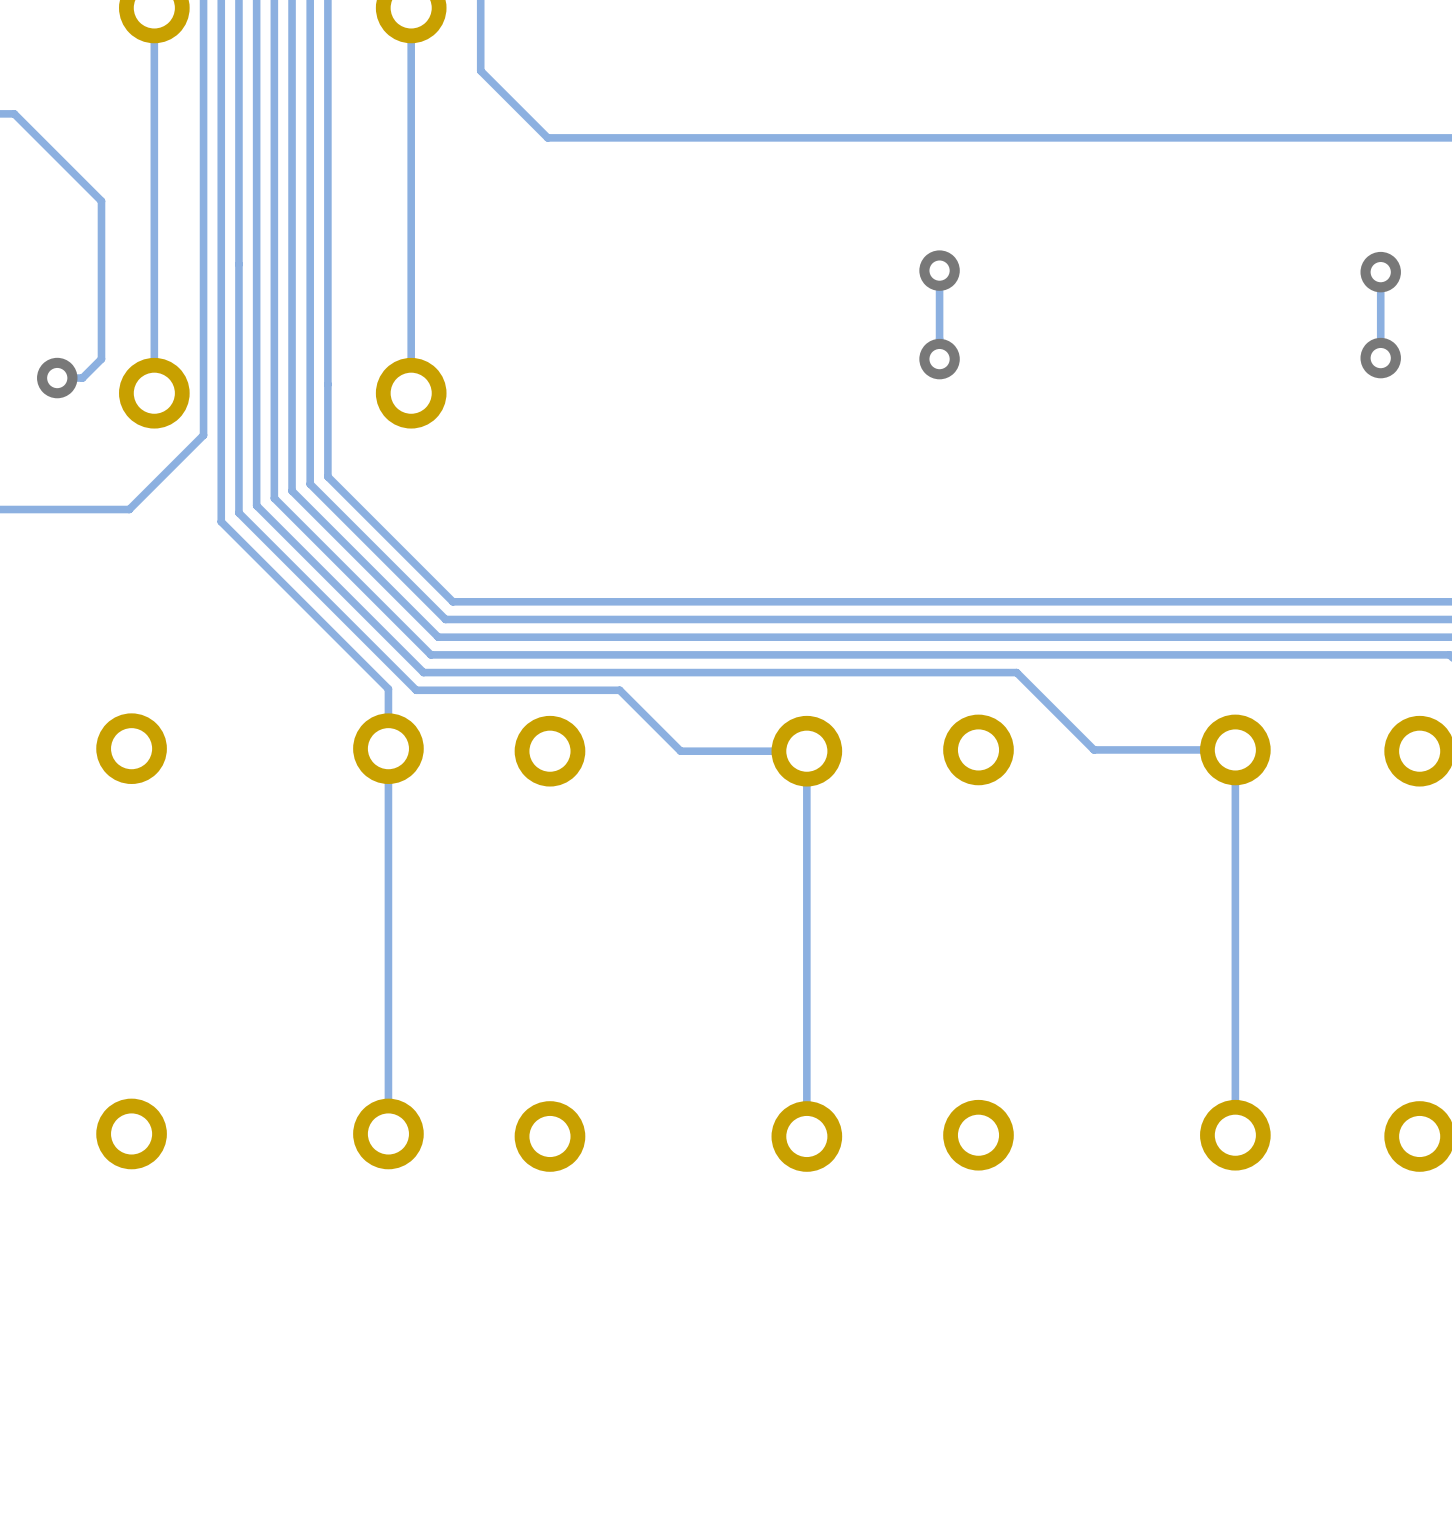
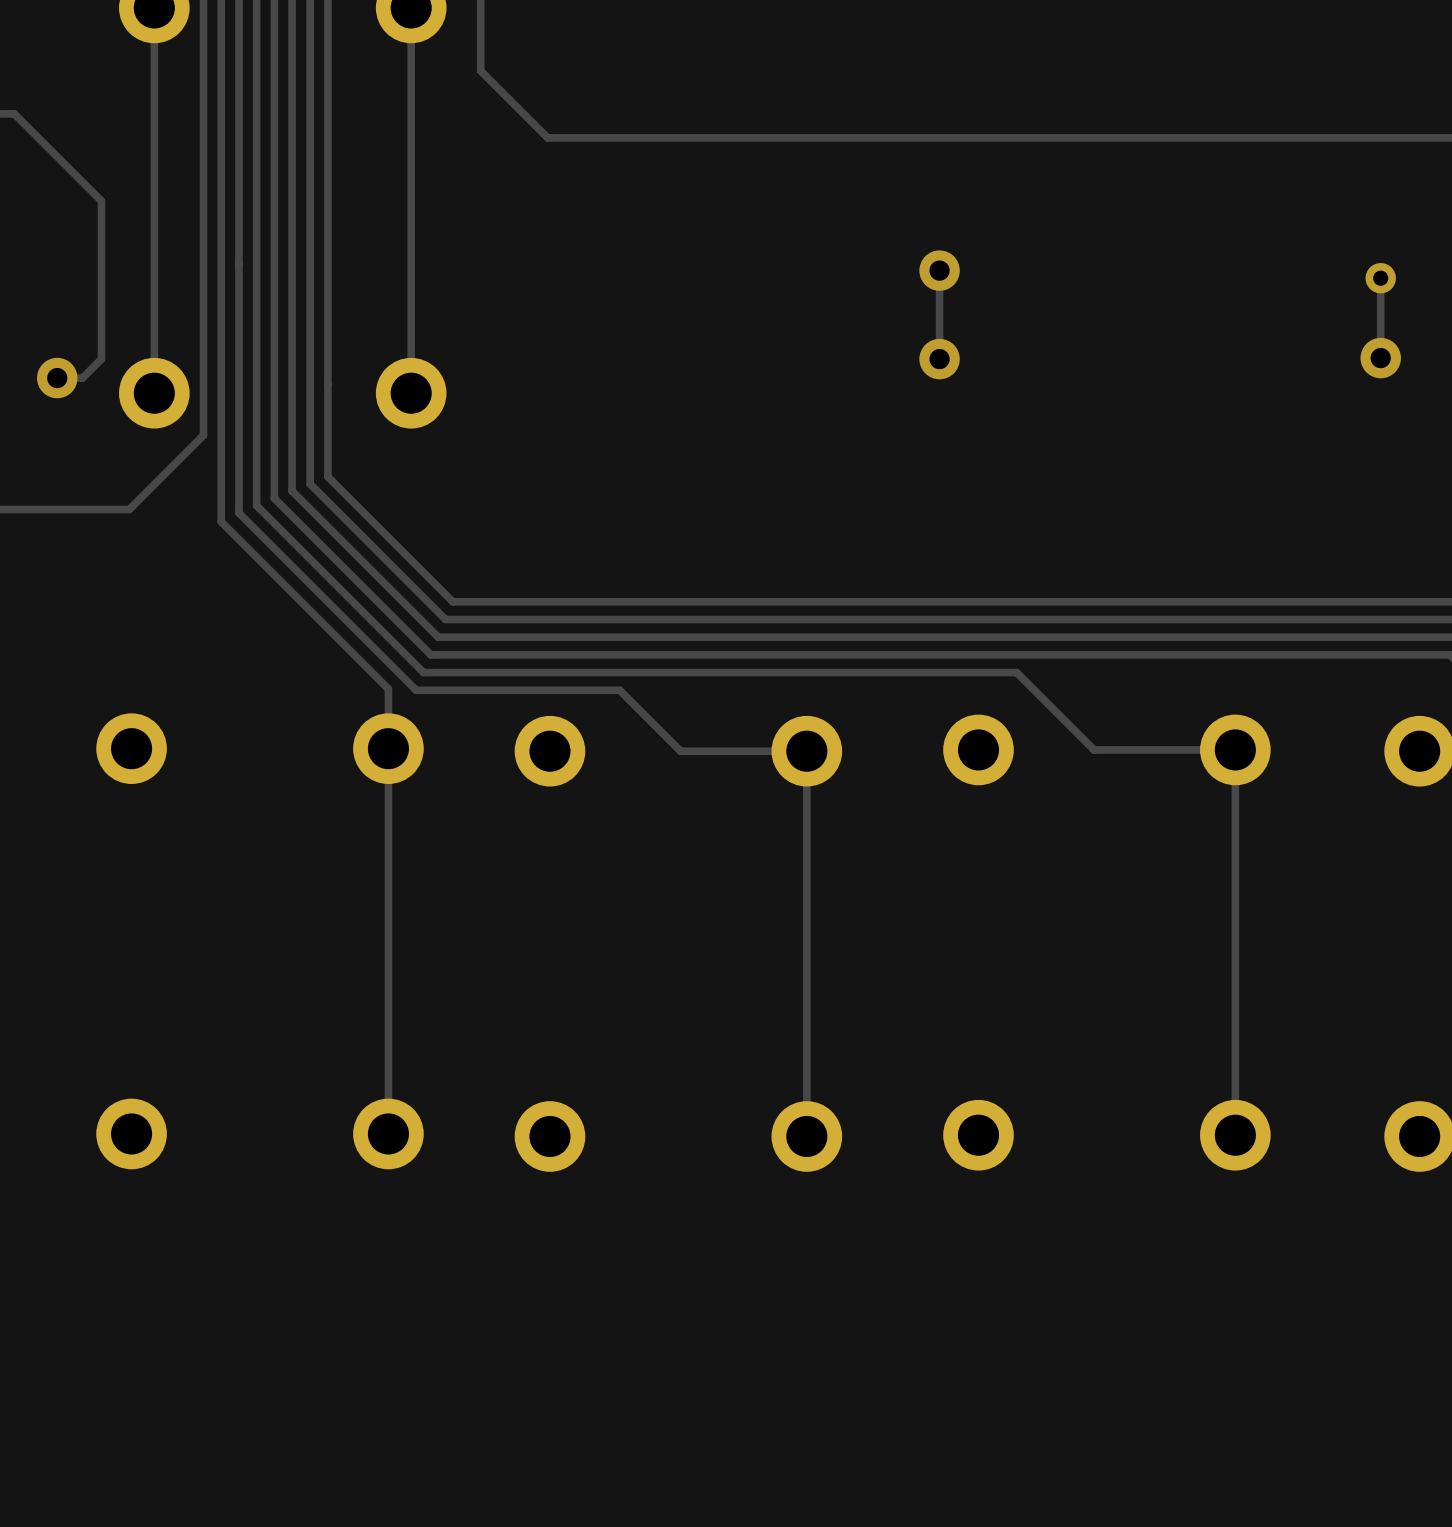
via size: [1360, 251, 1401, 293] -> [1365, 263, 1396, 294]

